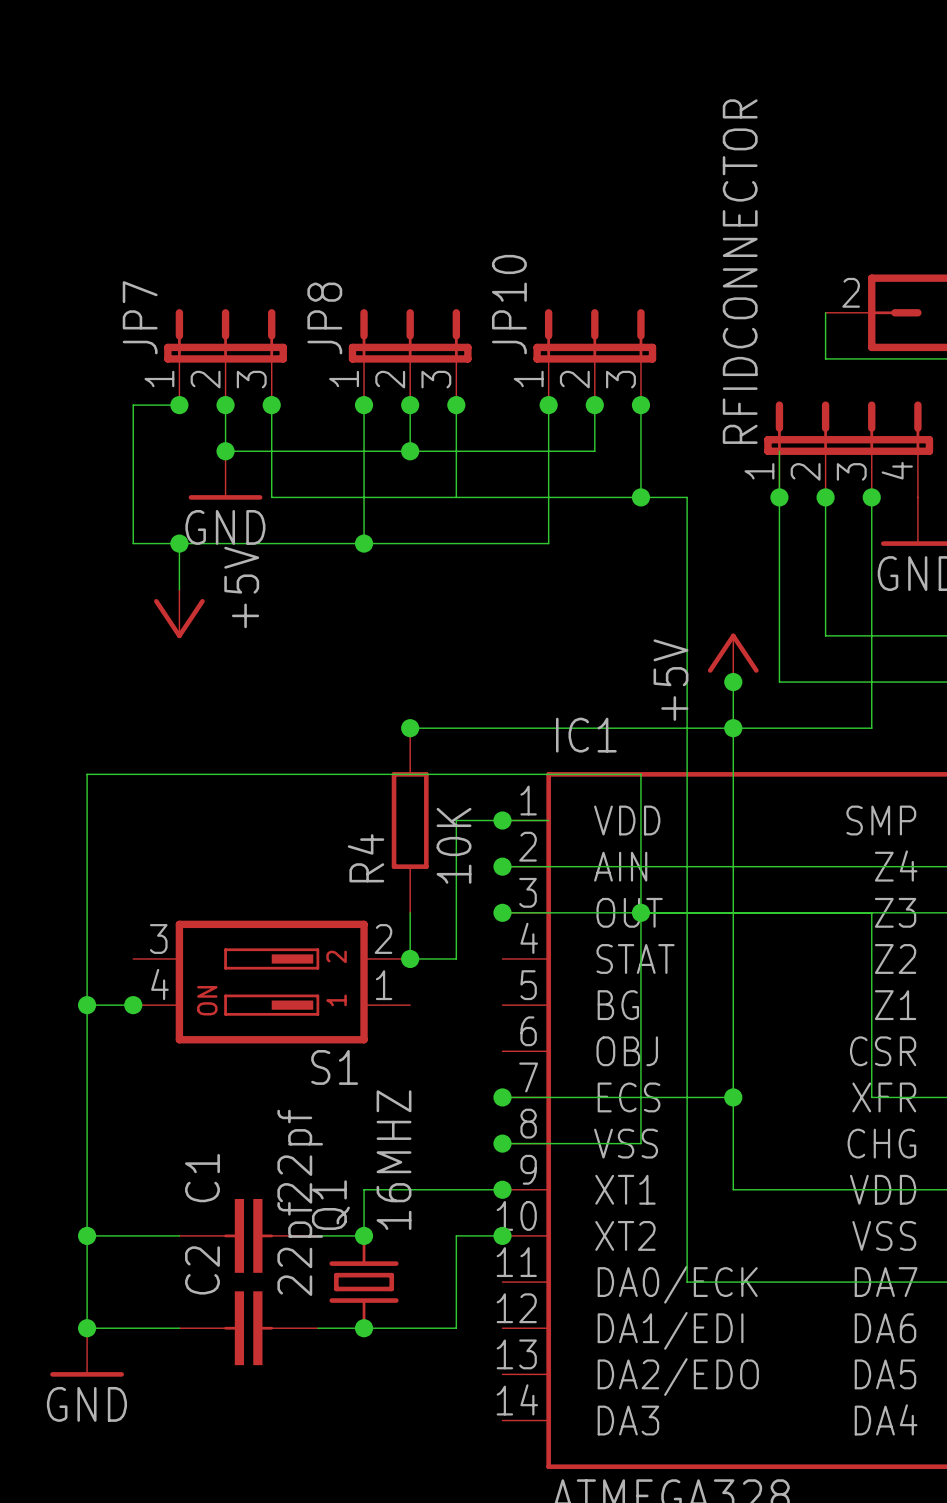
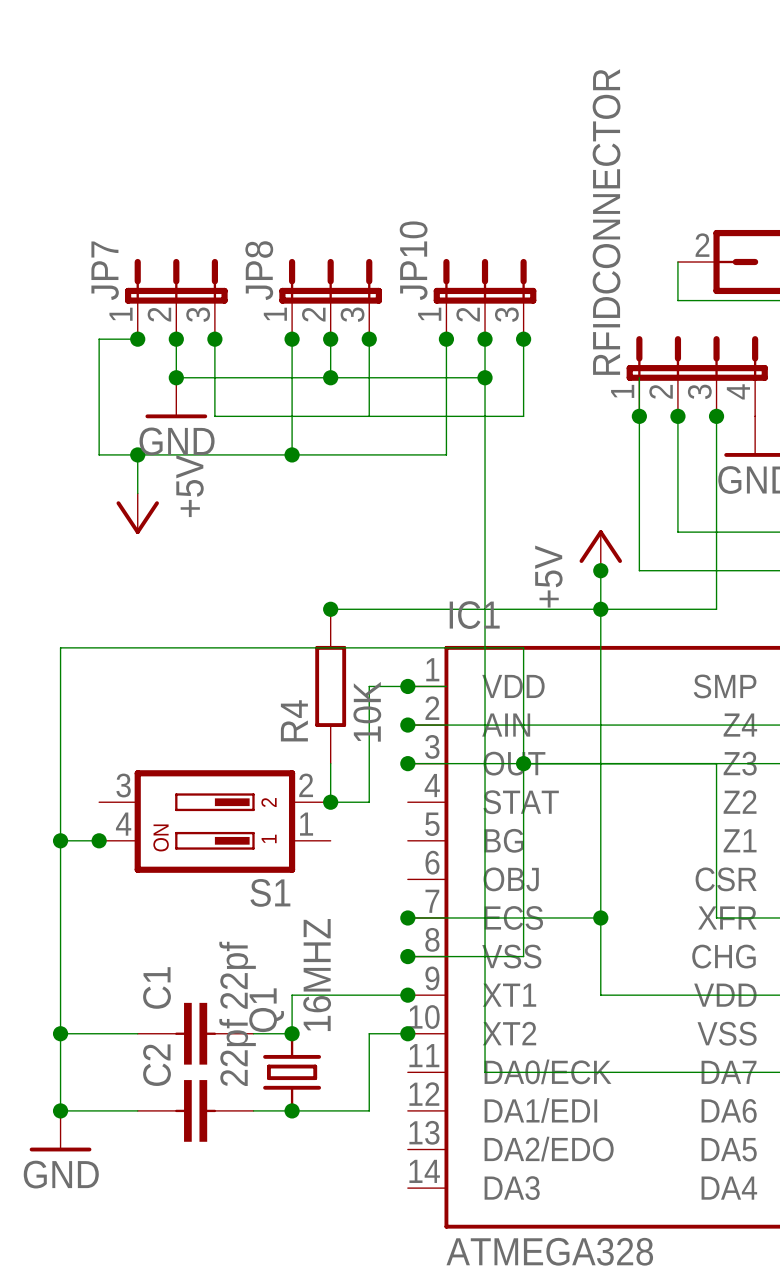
wire: (640, 497) (687, 497) (687, 1282) -> (485, 377) (485, 1072) (562, 1072)
junction position: (640, 497) -> (485, 377)

